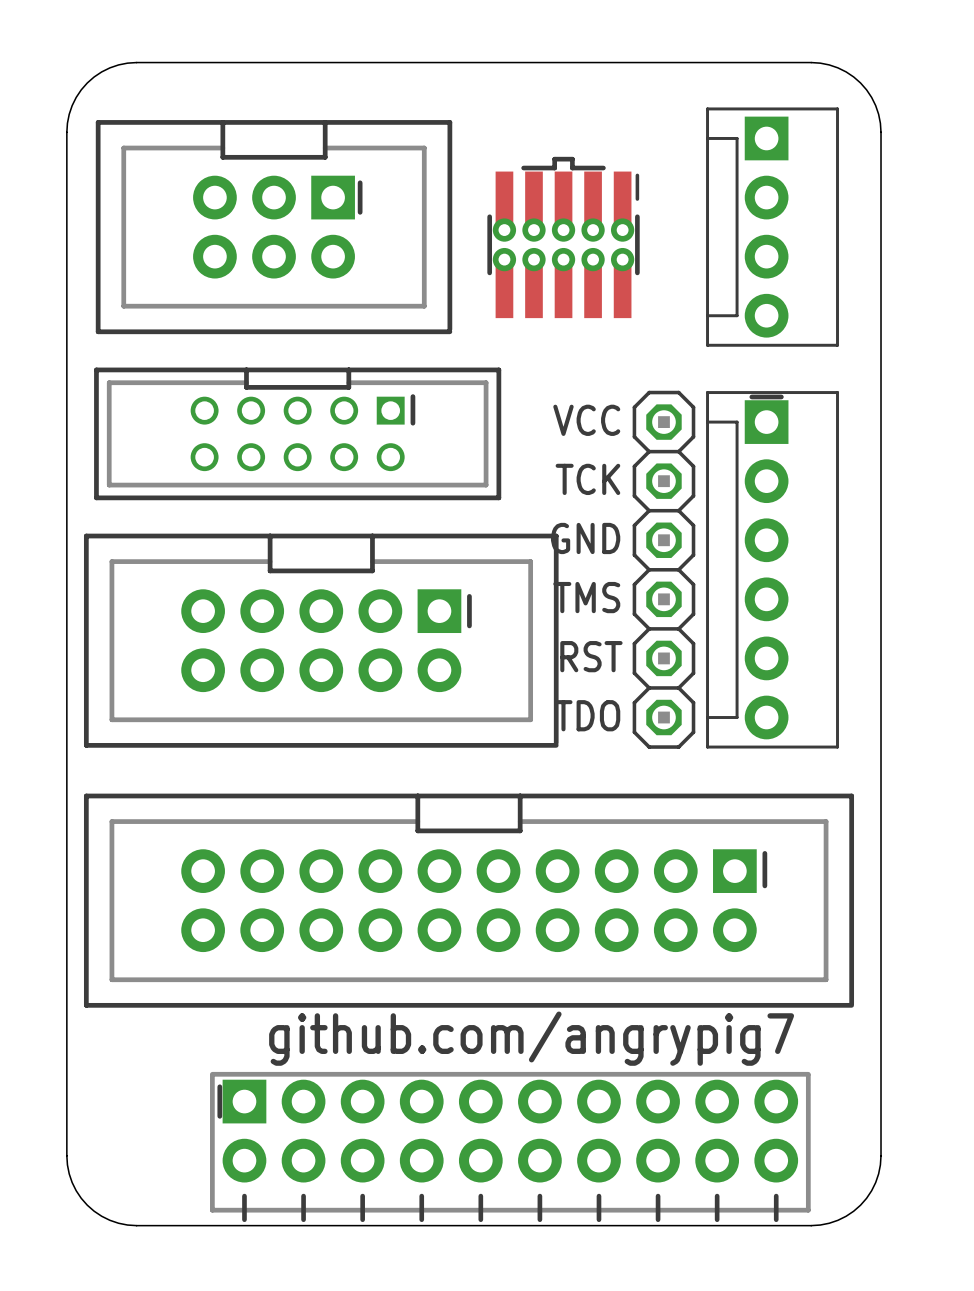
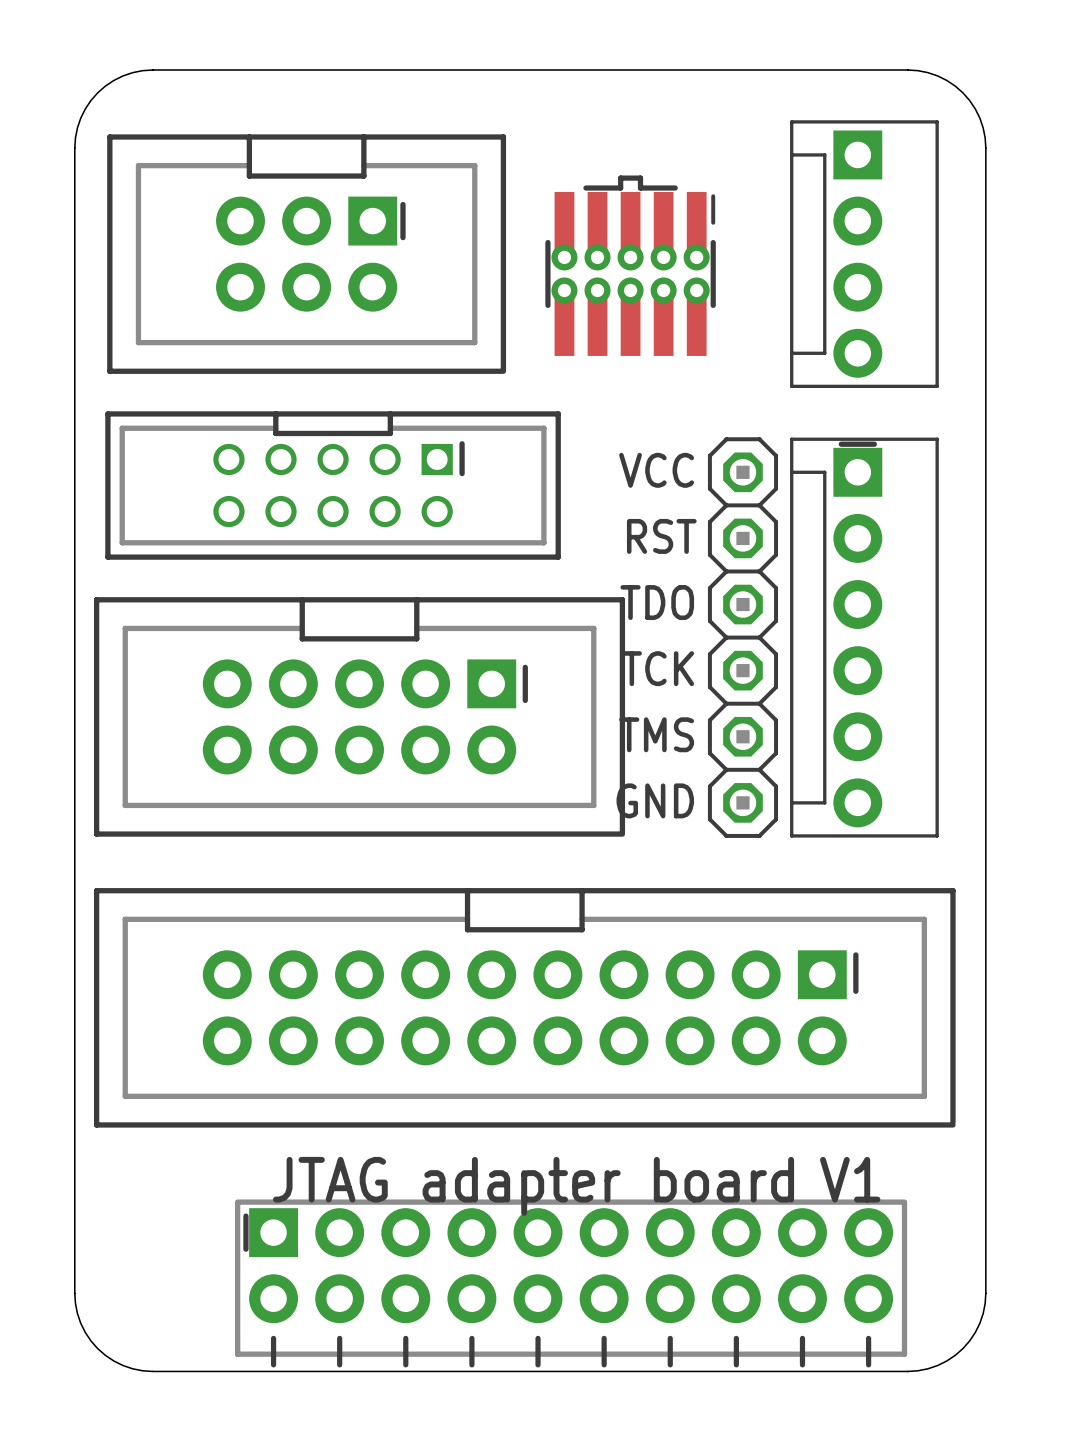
text: TCK (587, 479) -> RST (661, 536)
text: GND (585, 538) -> TDO (657, 602)
text: TMS (586, 597) -> TCK (657, 668)
text: RST (591, 656) -> TMS (656, 734)
text: TDO (587, 715) -> GND (655, 800)
text: github.com/angrypig7 (531, 1038) -> none
text: none -> V1 (850, 1179)
text: none -> JTAG adapter board (533, 1186)

